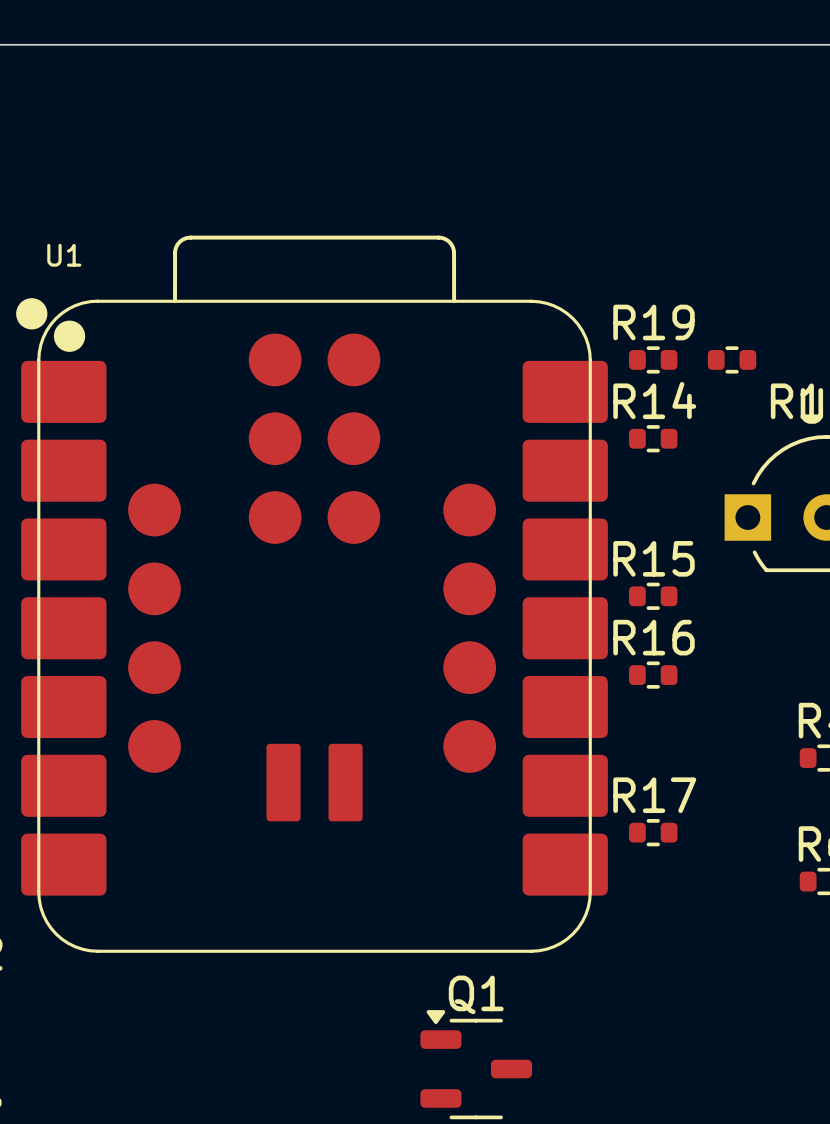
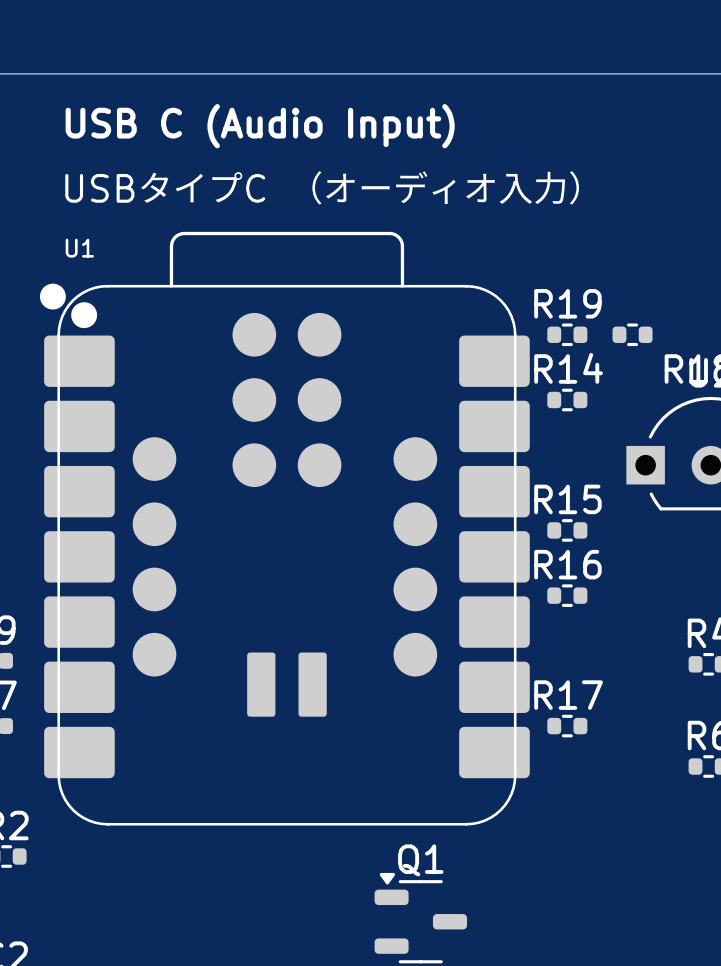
text: none -> USB C (Audio Input) (260, 126)
text: none -> USBタイプC （オーディオ入力） (322, 187)

